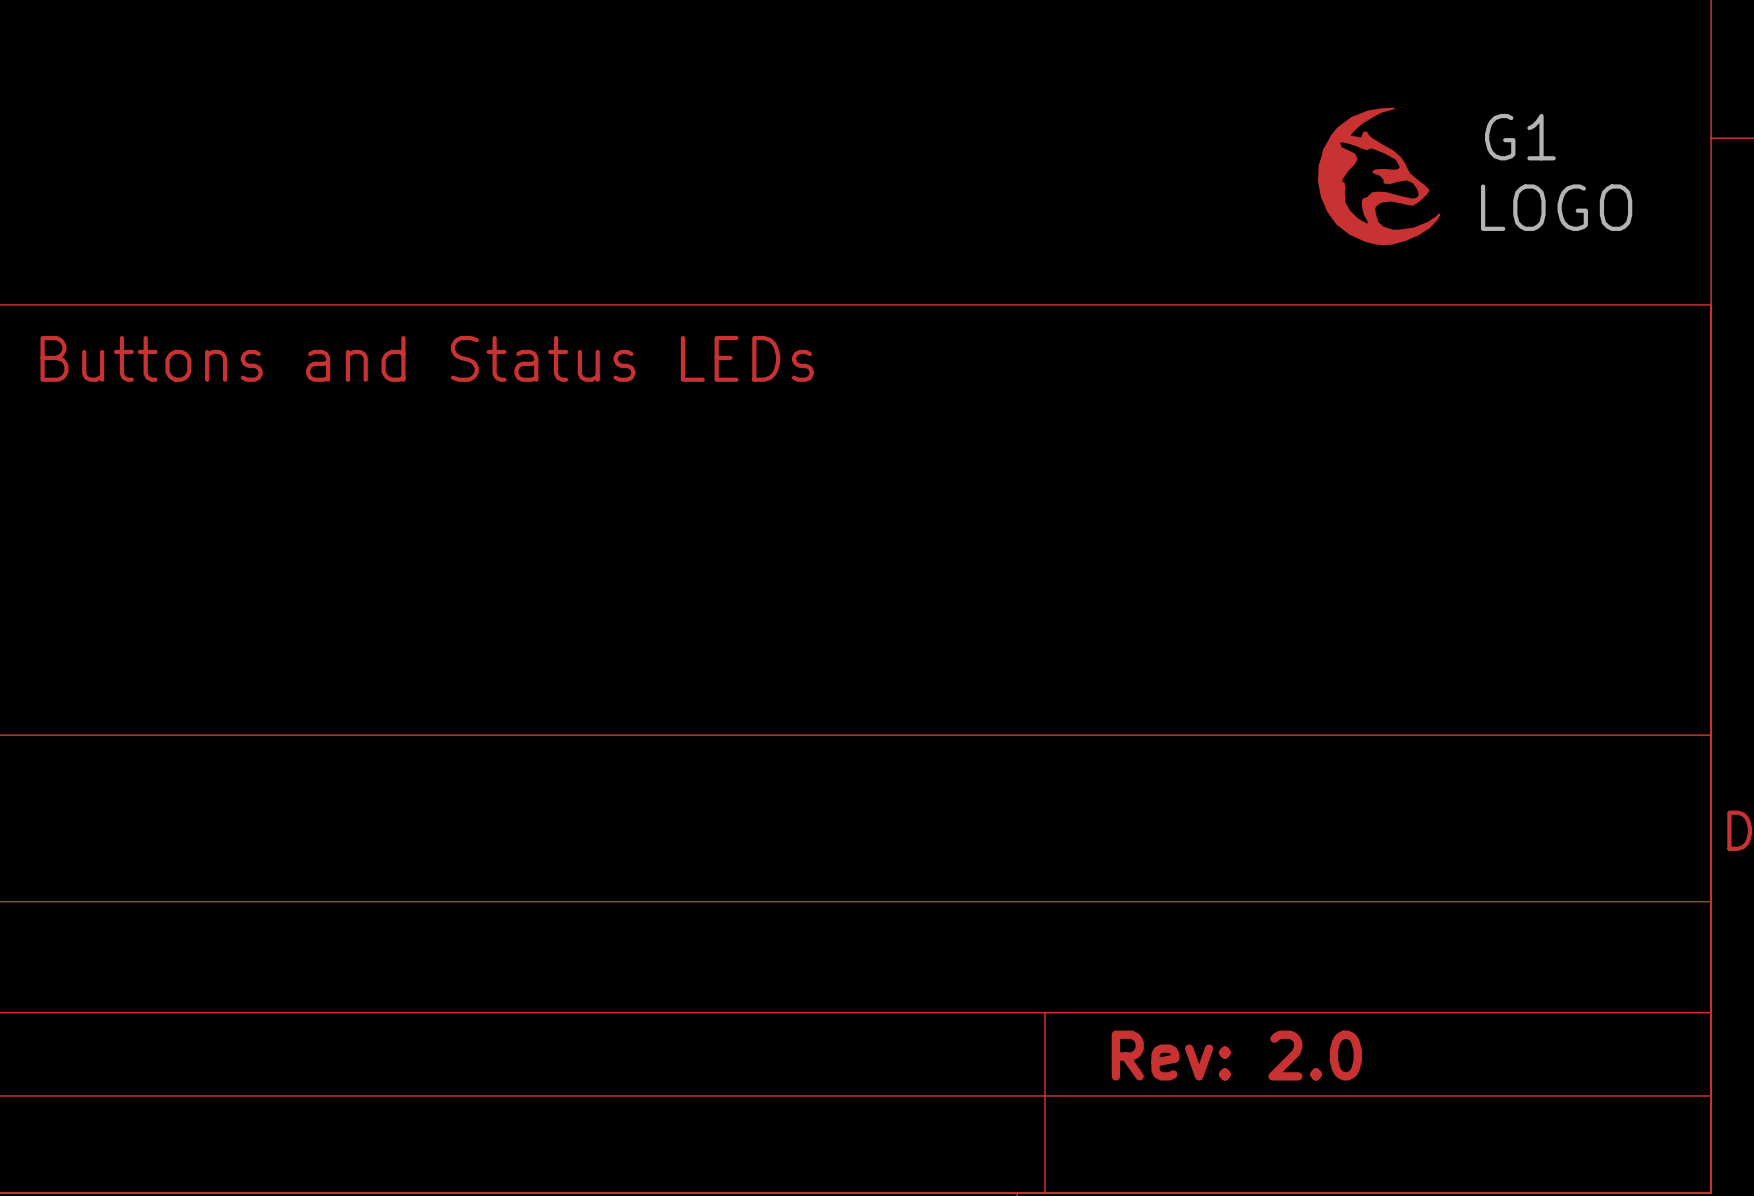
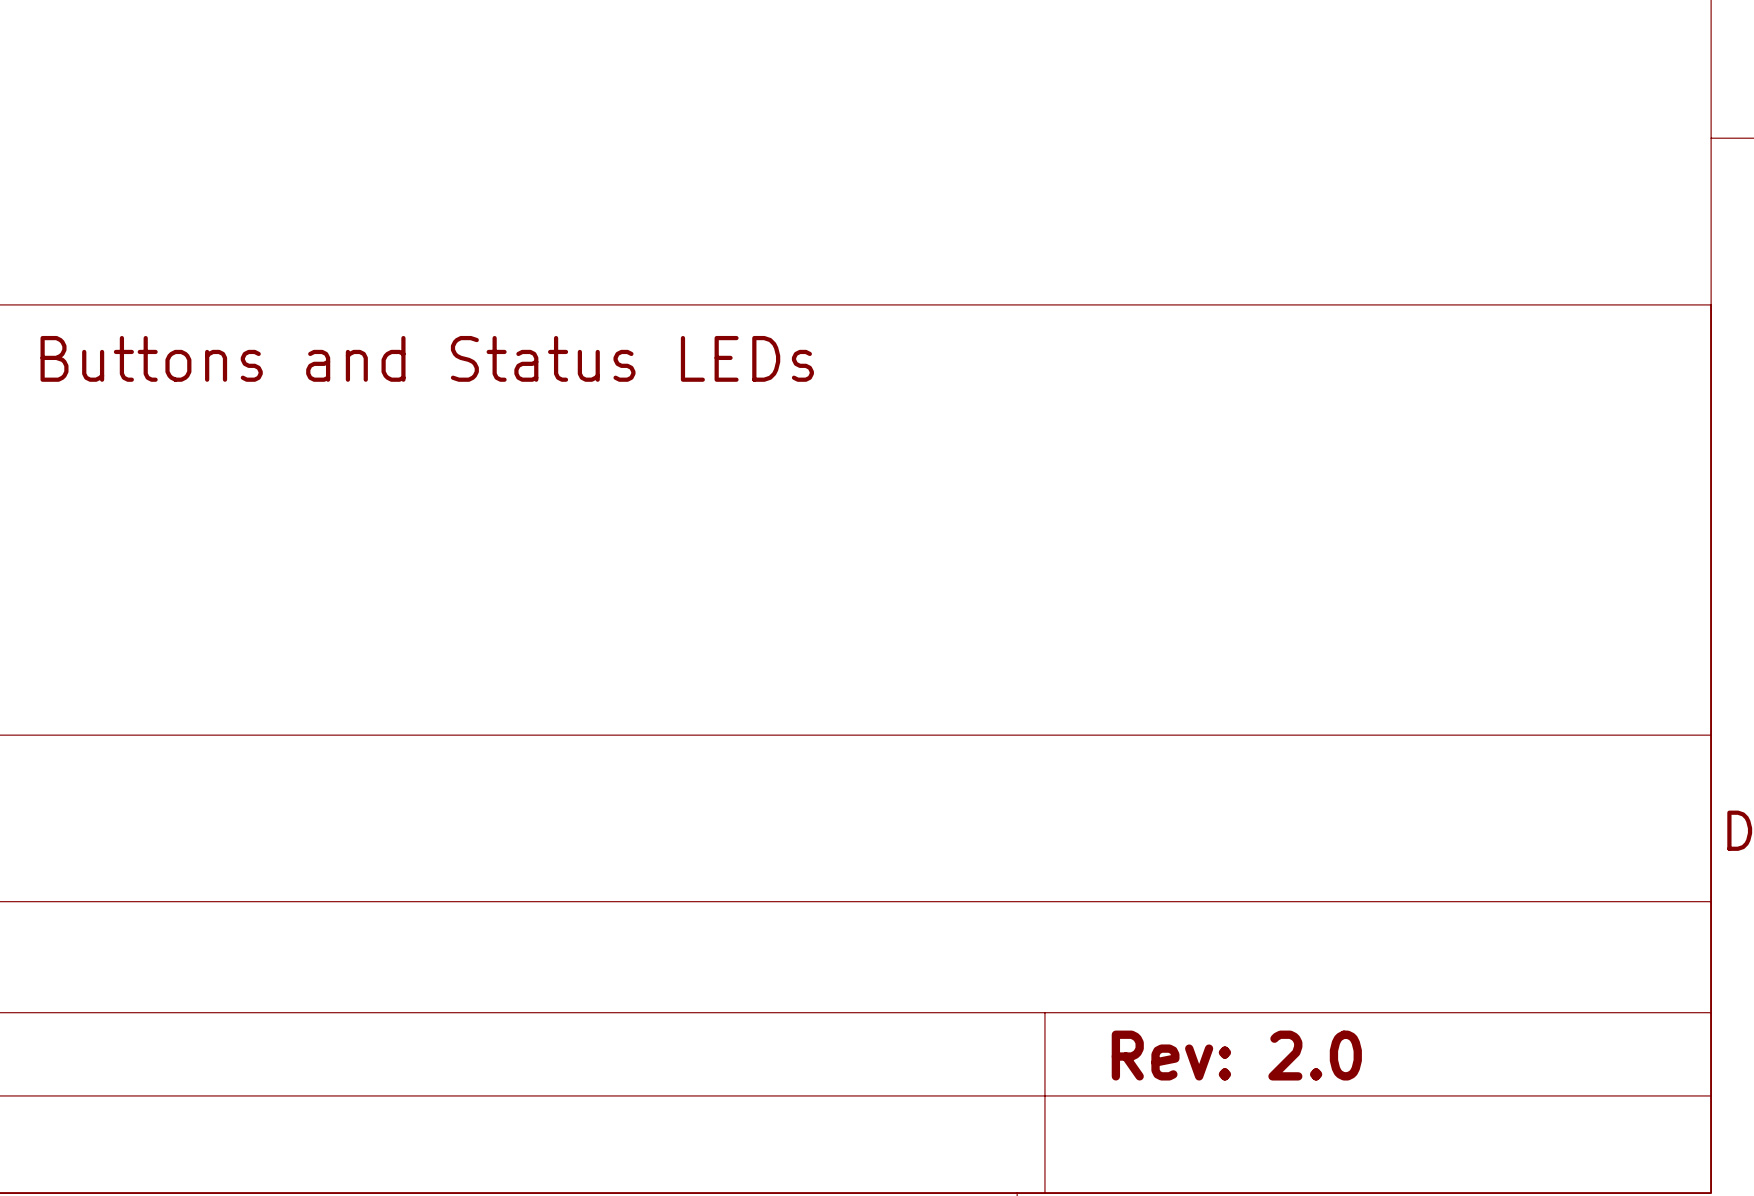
G1: LOGO (1379, 176) -> none

